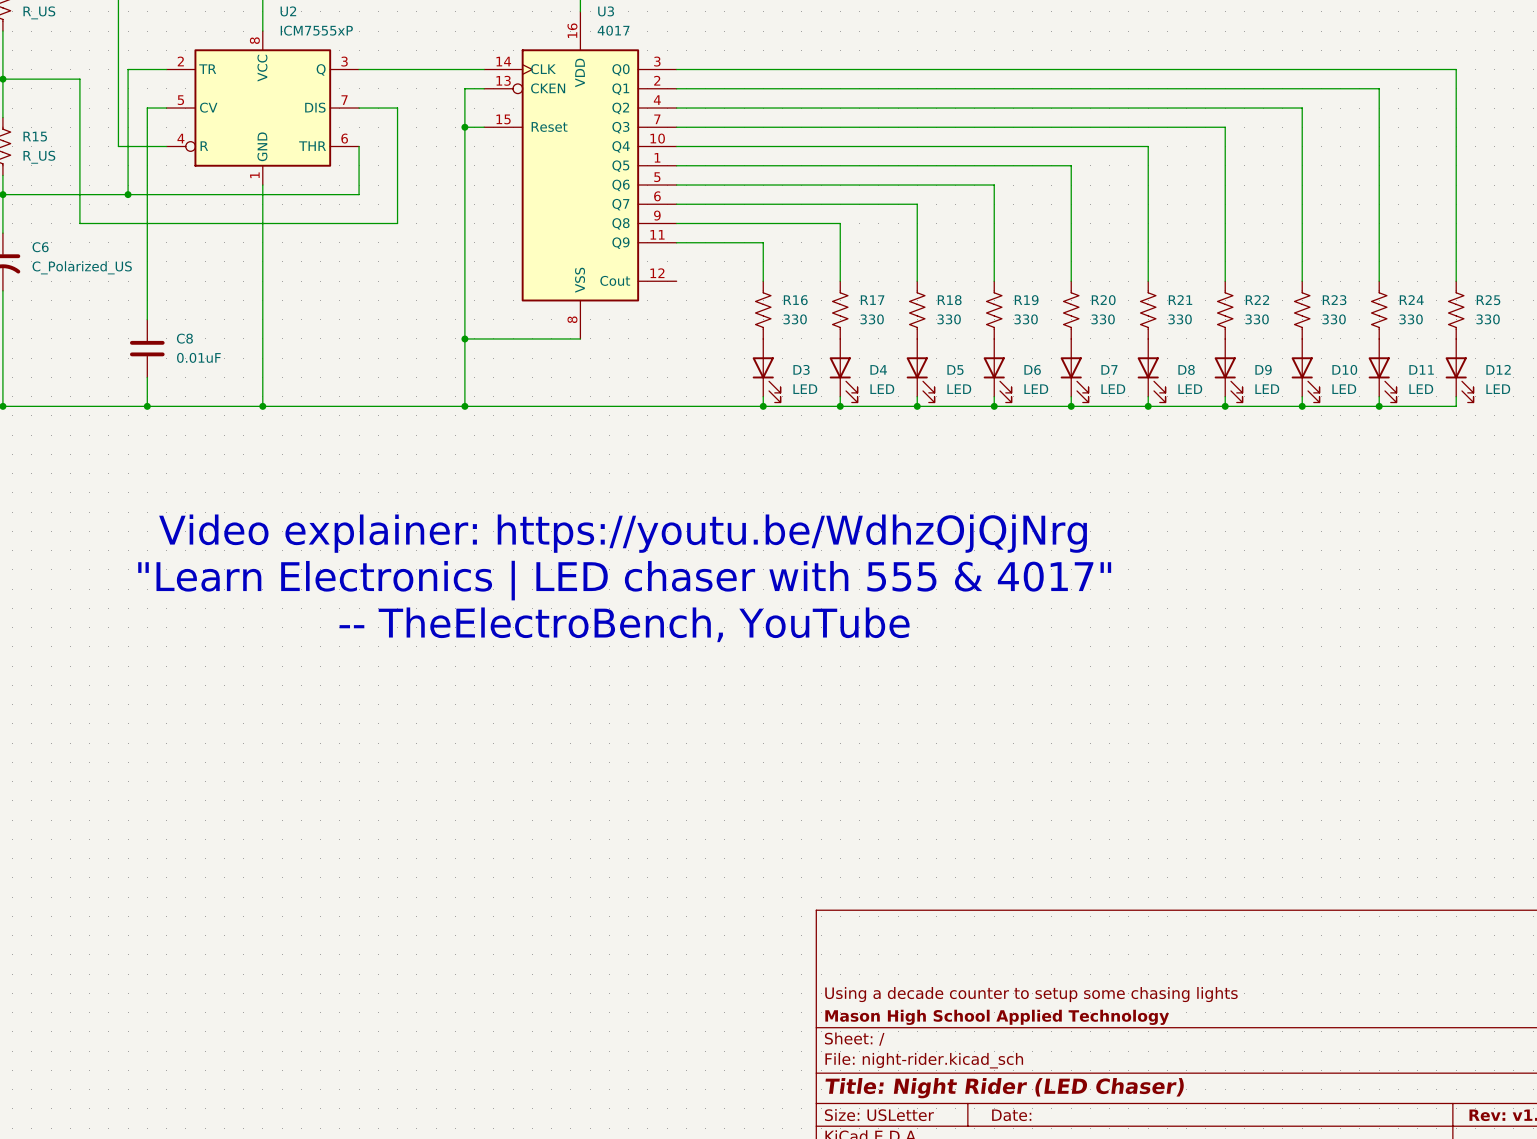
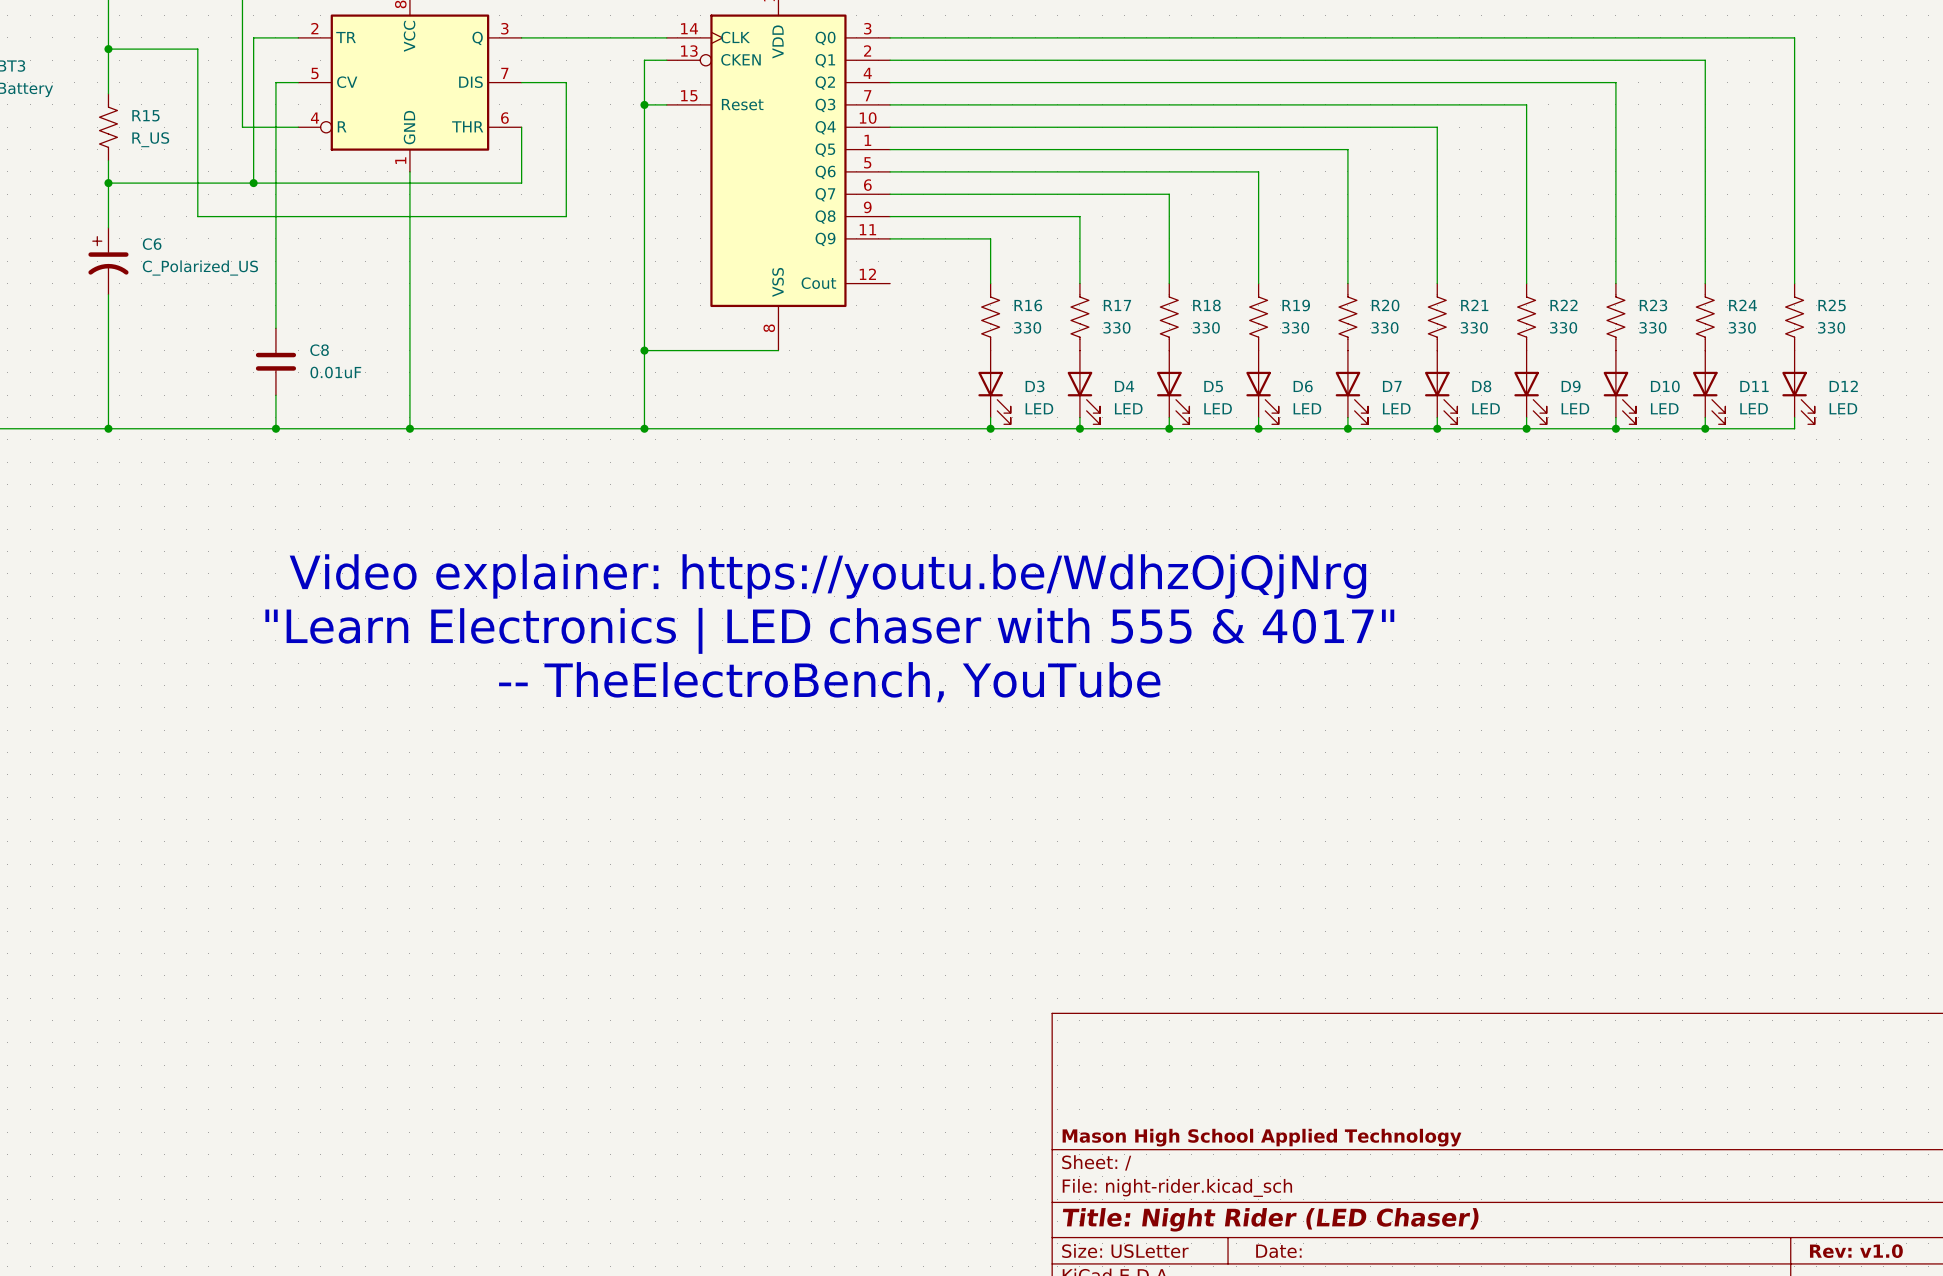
title block: Using a decade counter to setup some chasing lights (1031, 994) -> none

